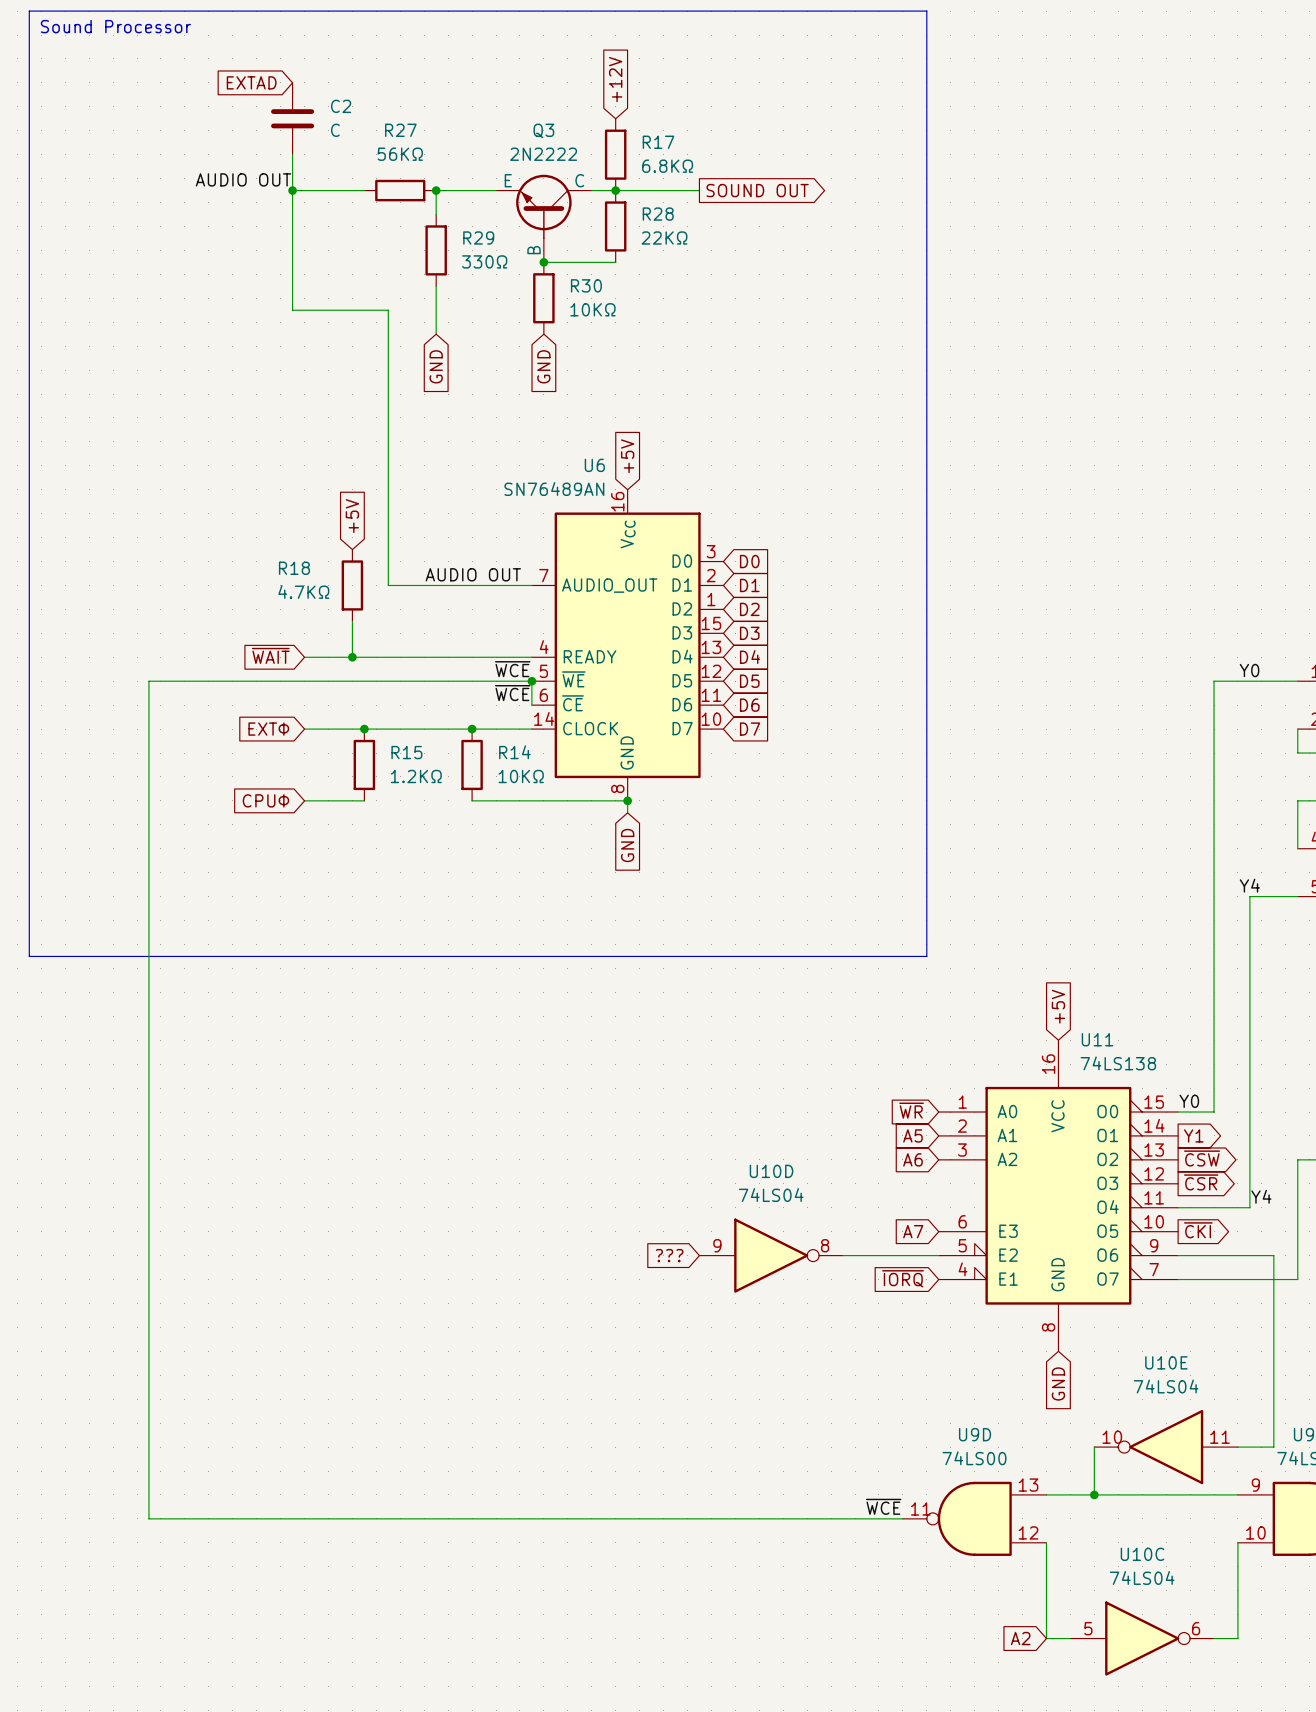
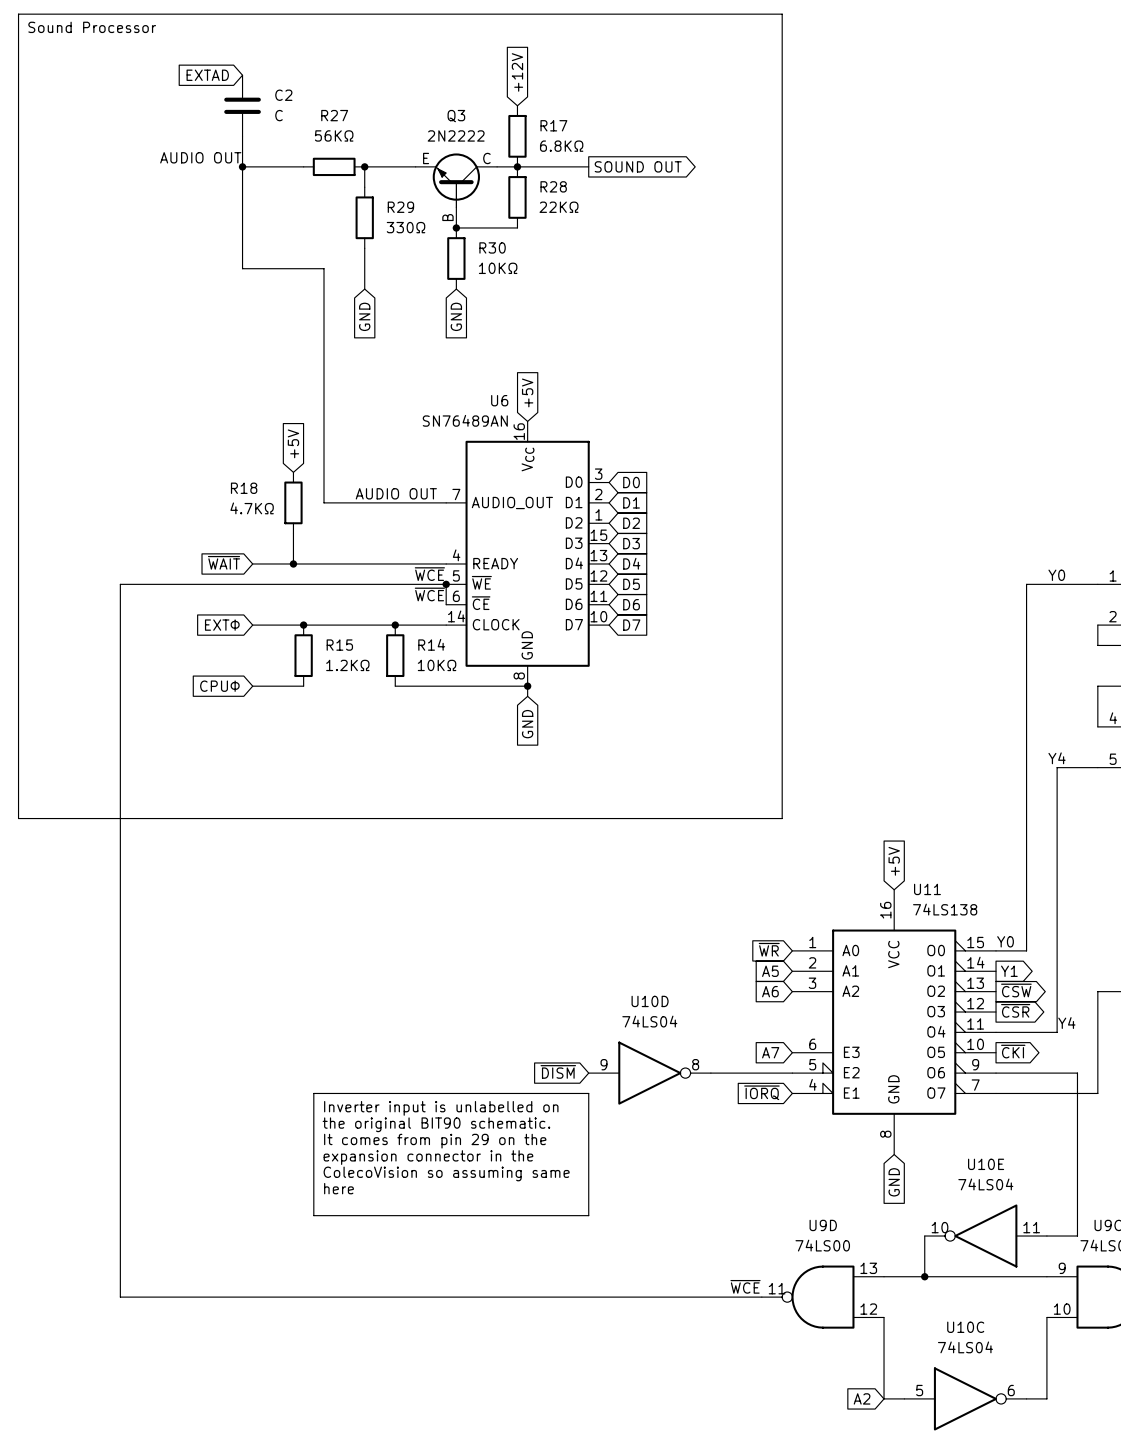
global label: ??? (669, 1255) -> ~{DISM} (558, 1071)
line: none -> (313, 1093) (588, 1093) (588, 1215) (313, 1215) (313, 1093)
text: none -> Inverter input is unlabelled on (441, 1108)
text: none -> the original BIT90 schematic. (436, 1124)
text: none -> It comes from pin 29 on the (435, 1141)
text: none -> expansion connector in the (428, 1157)
text: none -> ColecoVision so assuming same (446, 1173)
text: none -> here (338, 1188)

